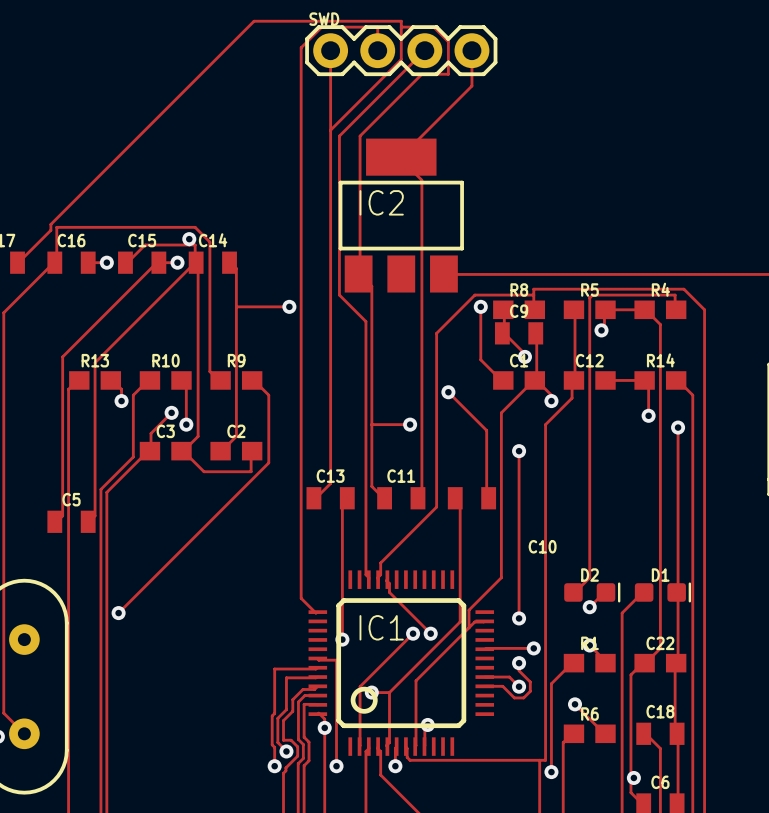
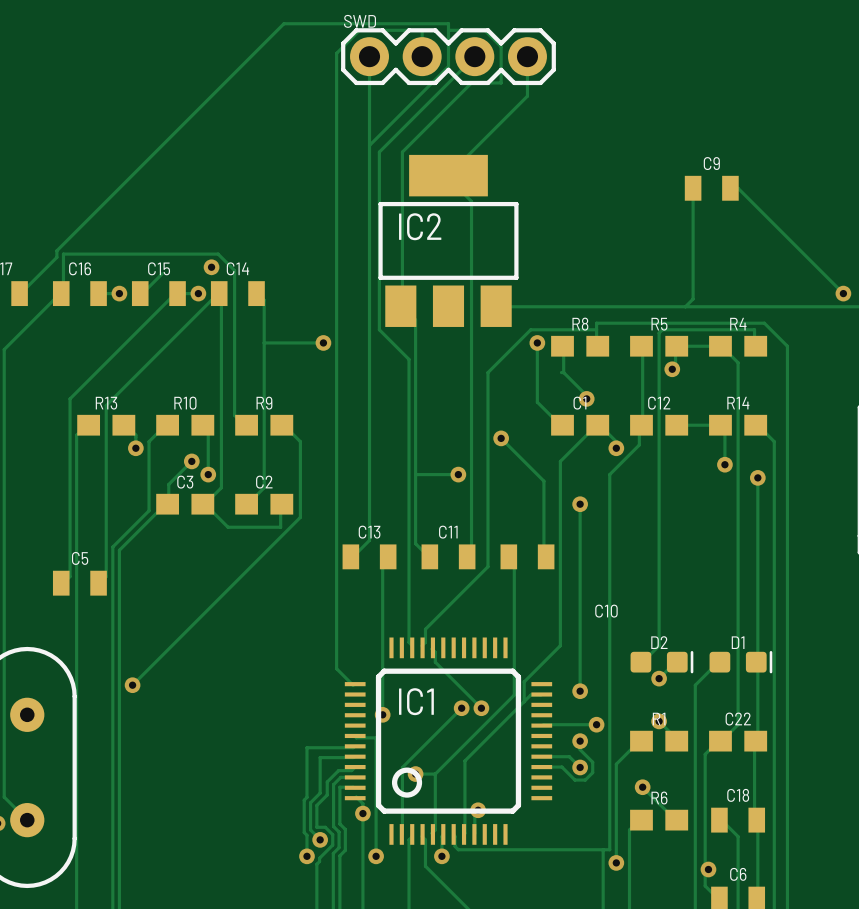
track: none -> (695, 188) (693, 188) (693, 299) (685, 306)
track: none -> (730, 188) (738, 188) (843, 293)
track: (145, 245) (195, 245) (195, 262) -> none
via: none -> (843, 293)
C9 position: (519, 333) -> (711, 188)
track: (535, 333) (536, 380) -> none

